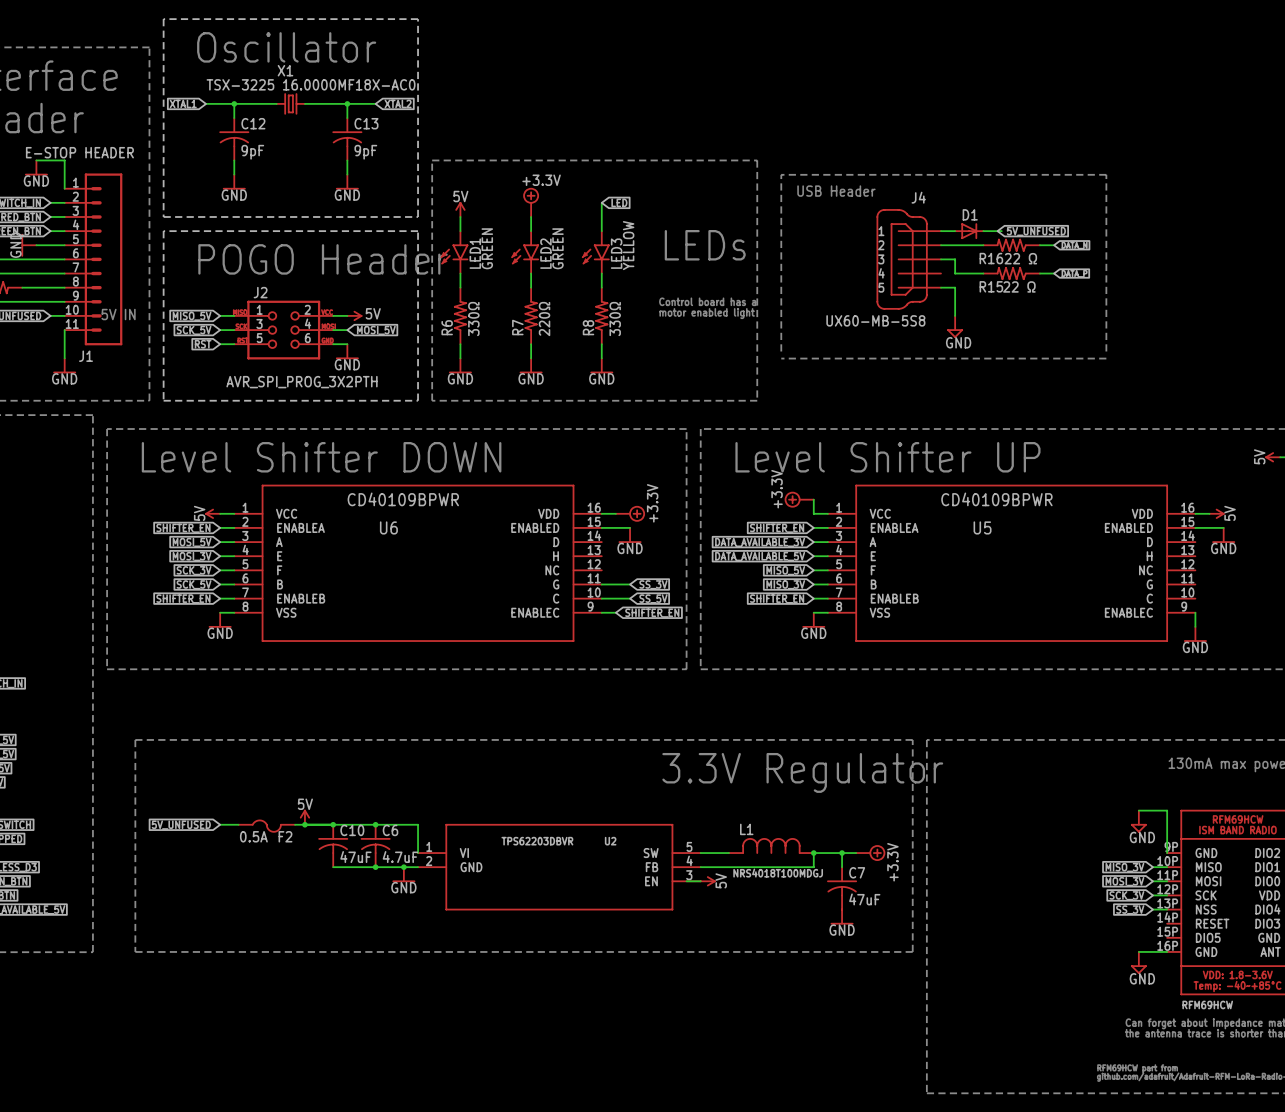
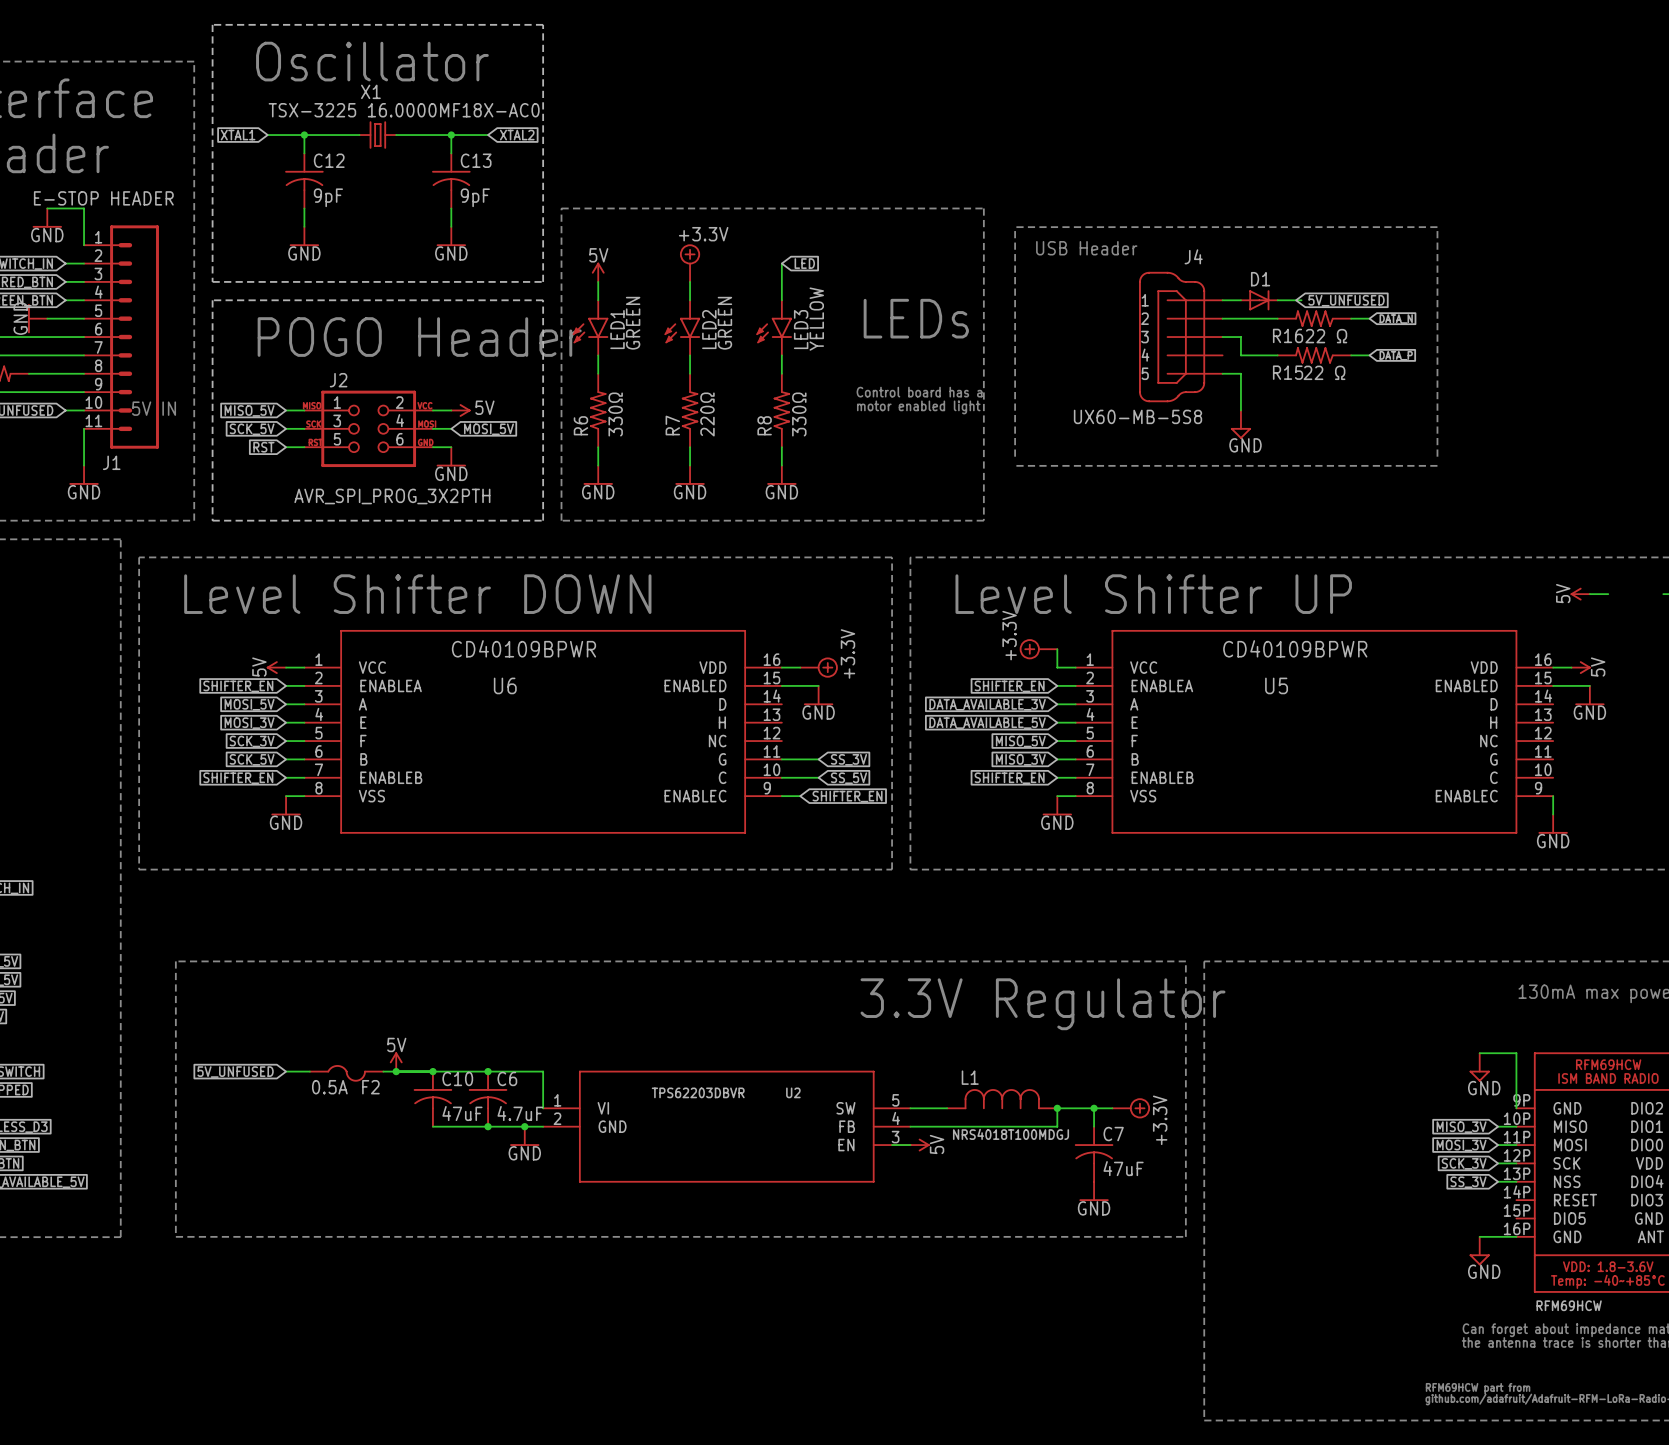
wire: none -> (1589, 594) (1608, 594)
power symbol position: 5V (1272, 457) -> 5V (1580, 594)

